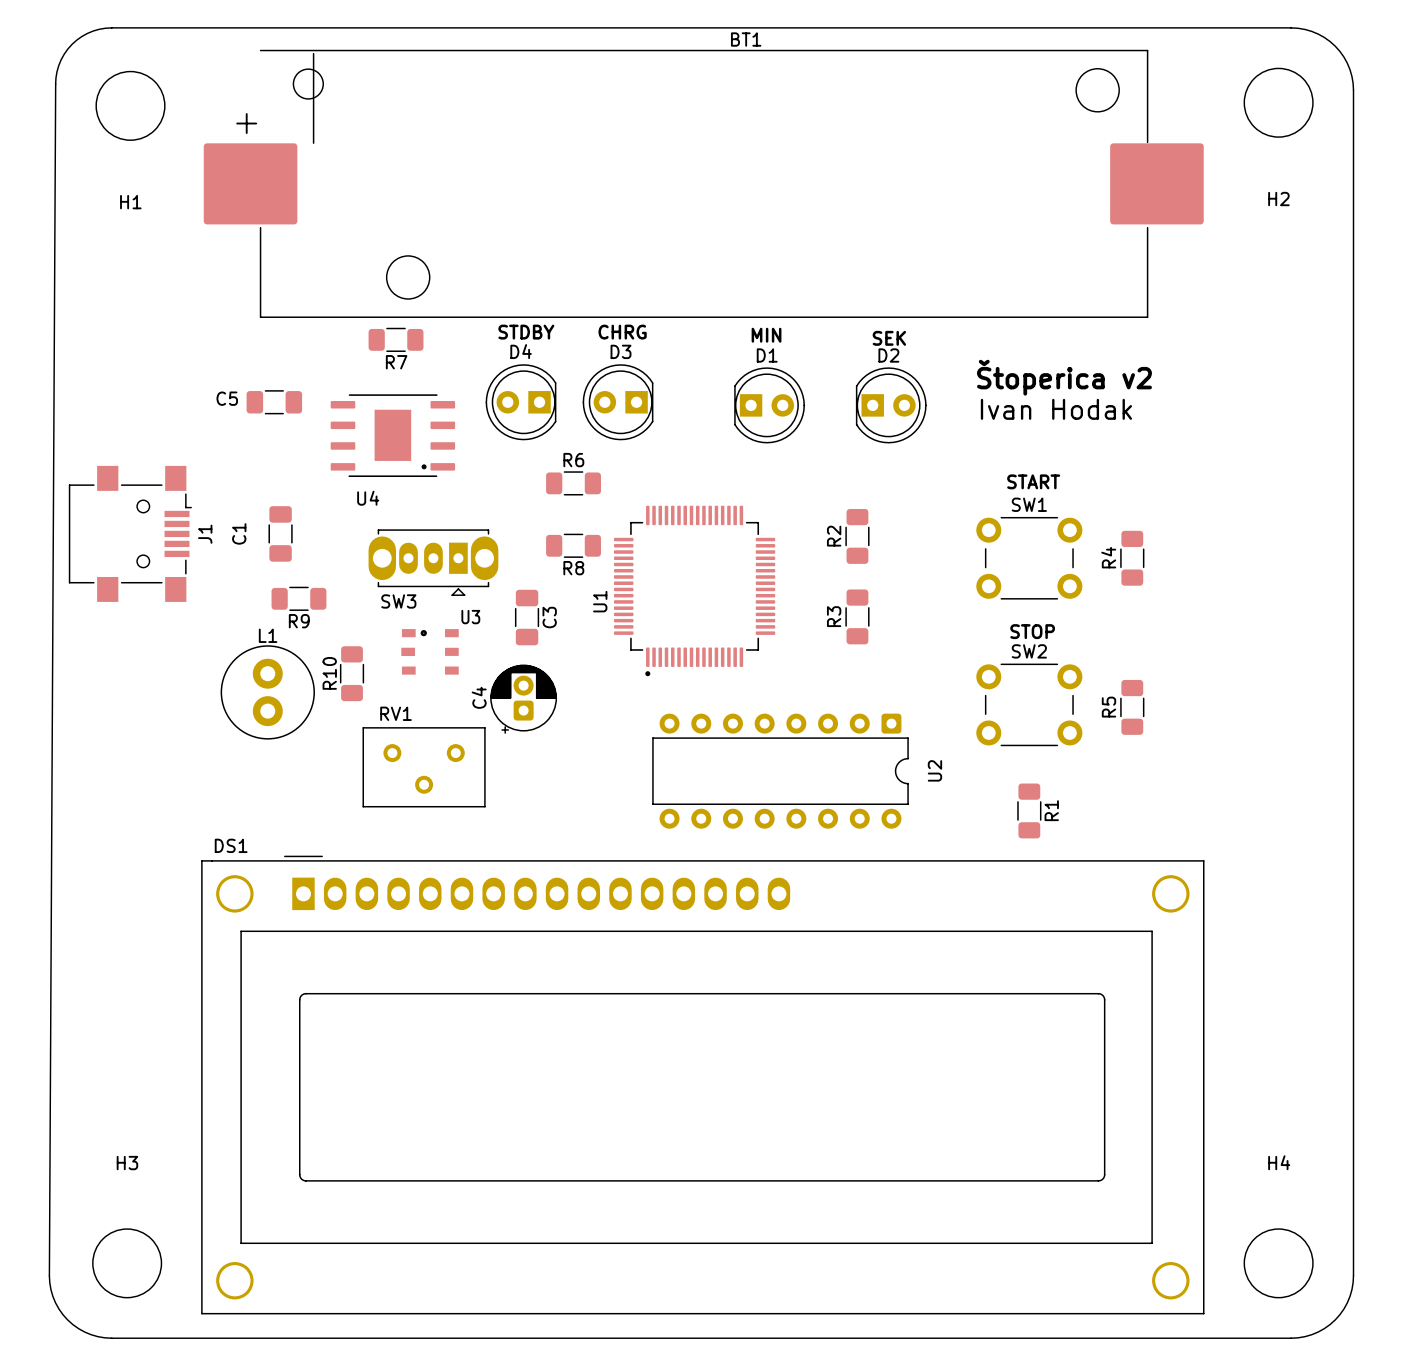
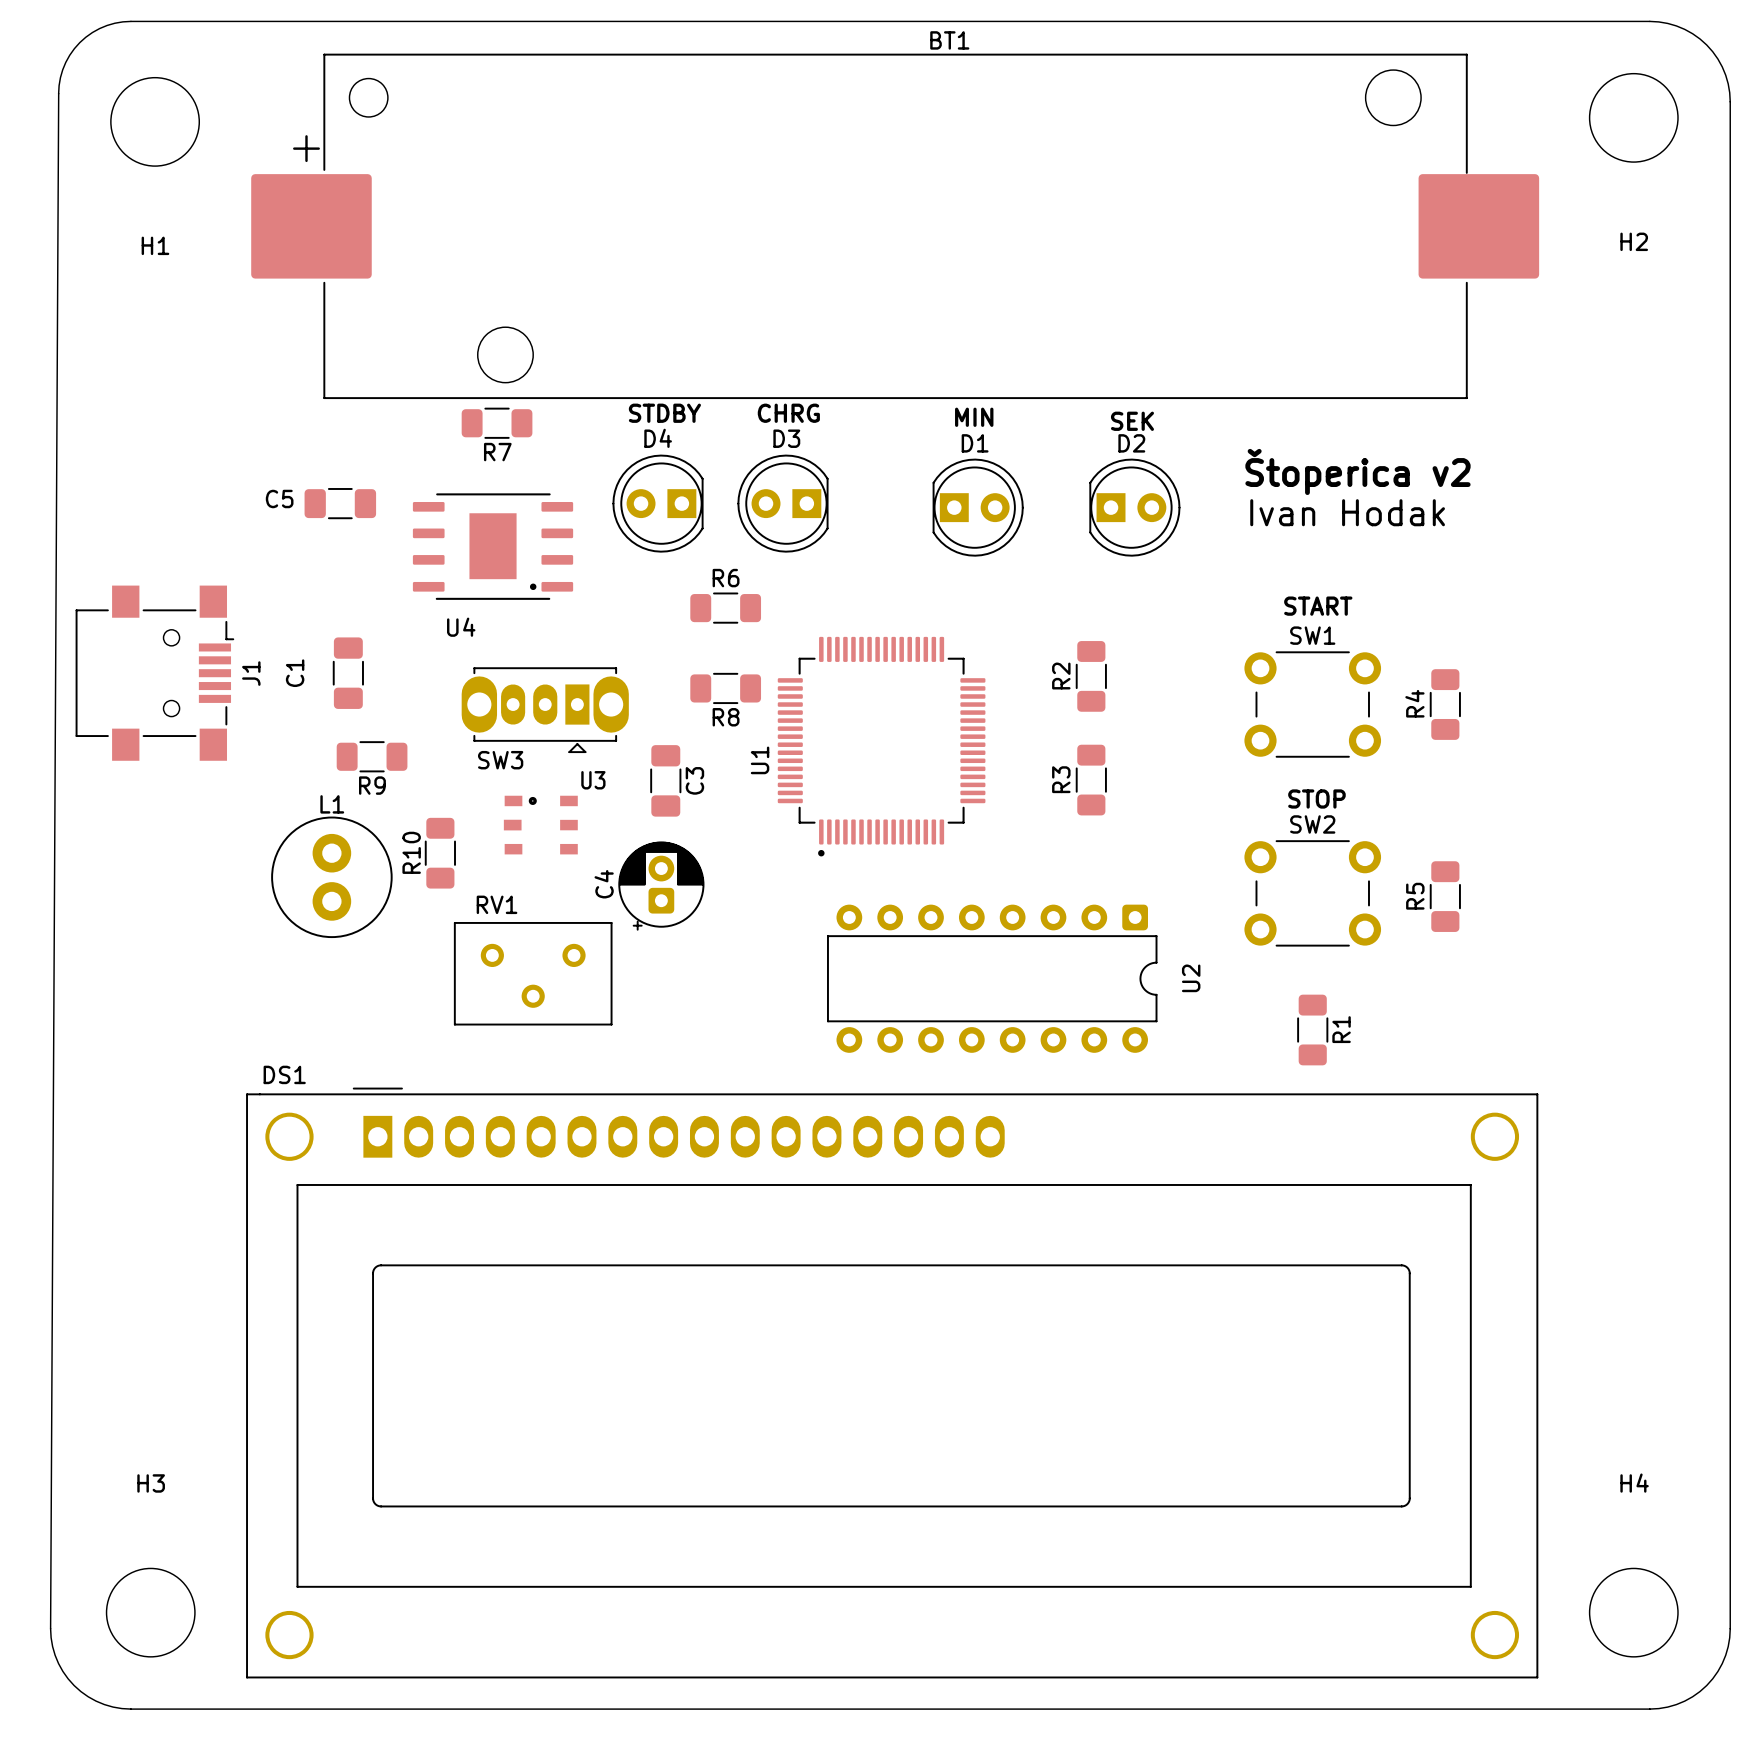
BT1 footprint: [203, 49, 1204, 318] -> [251, 53, 1540, 400]

